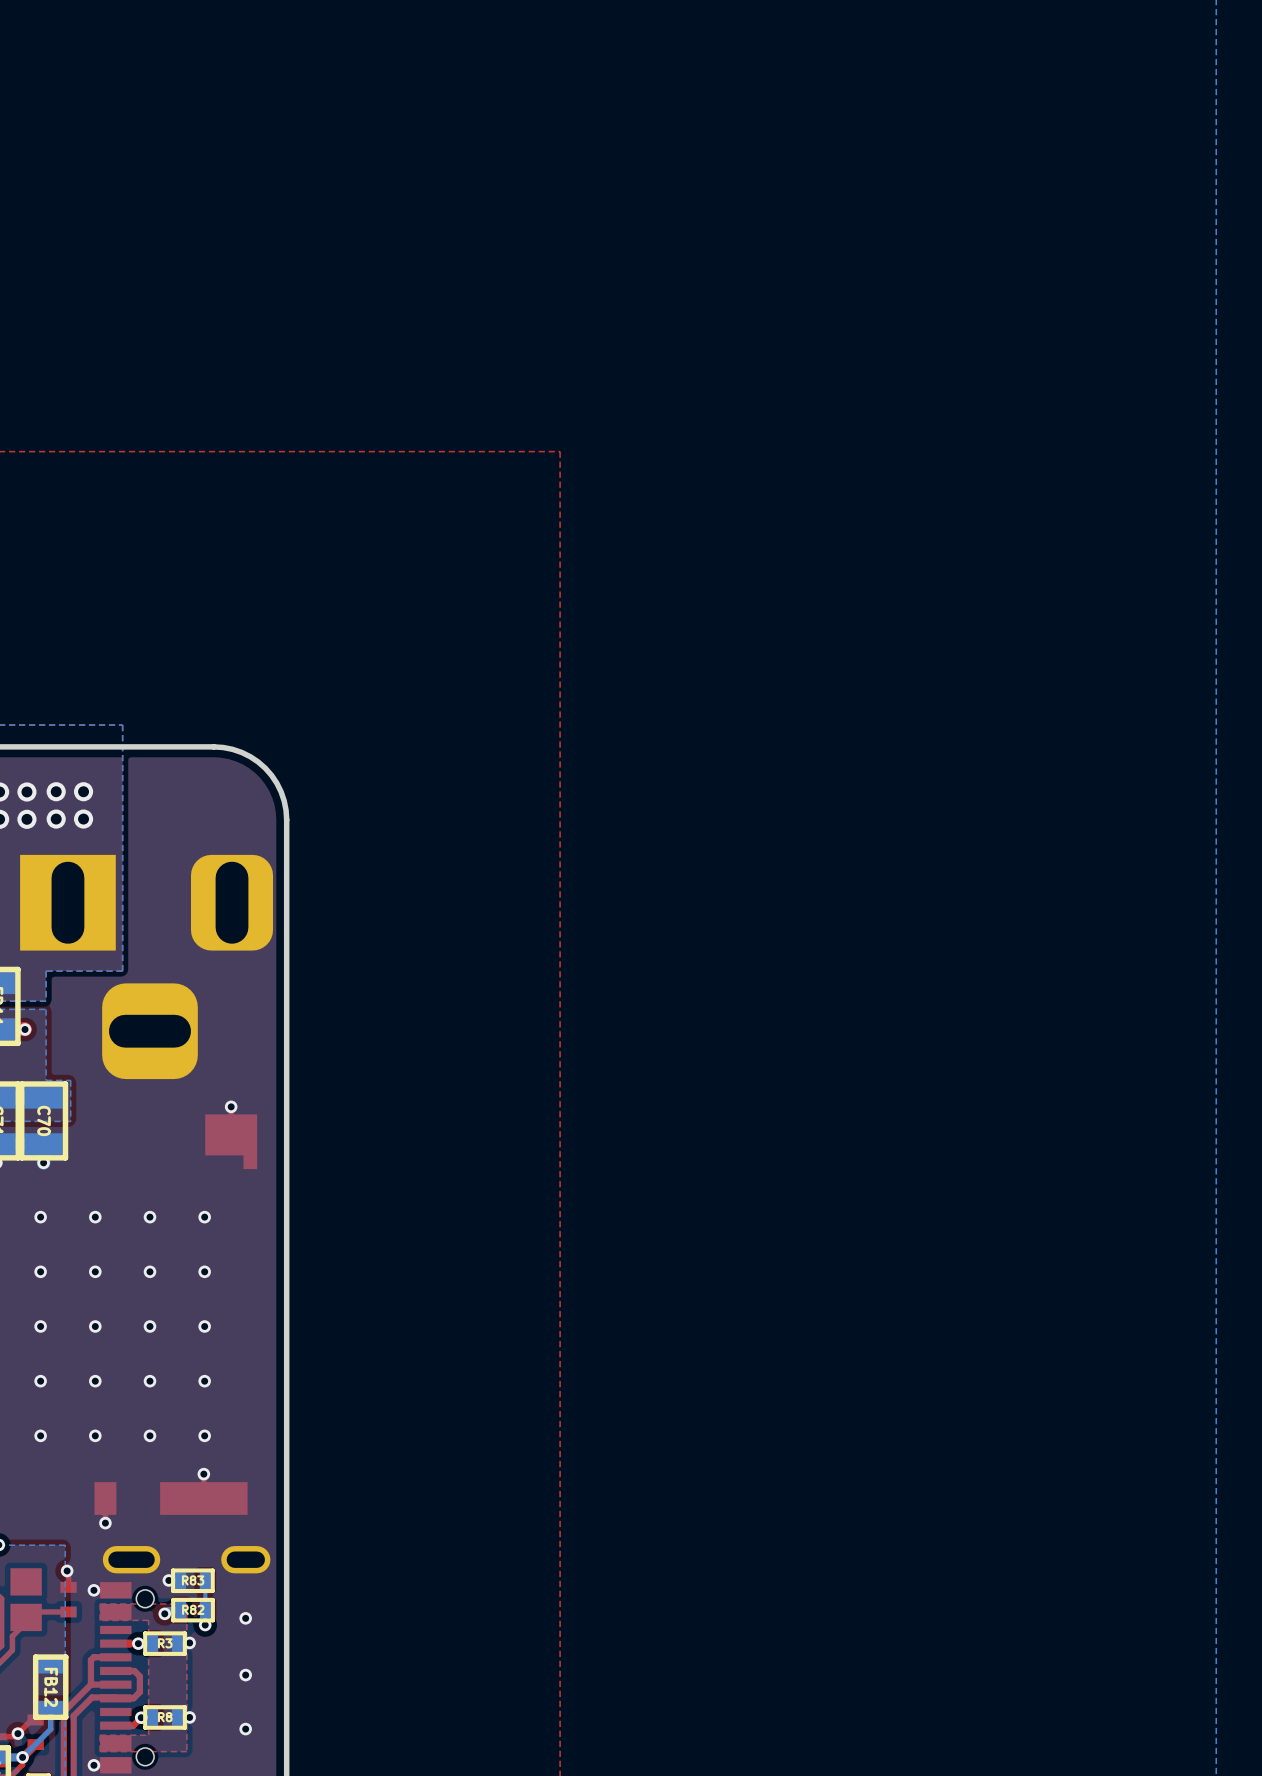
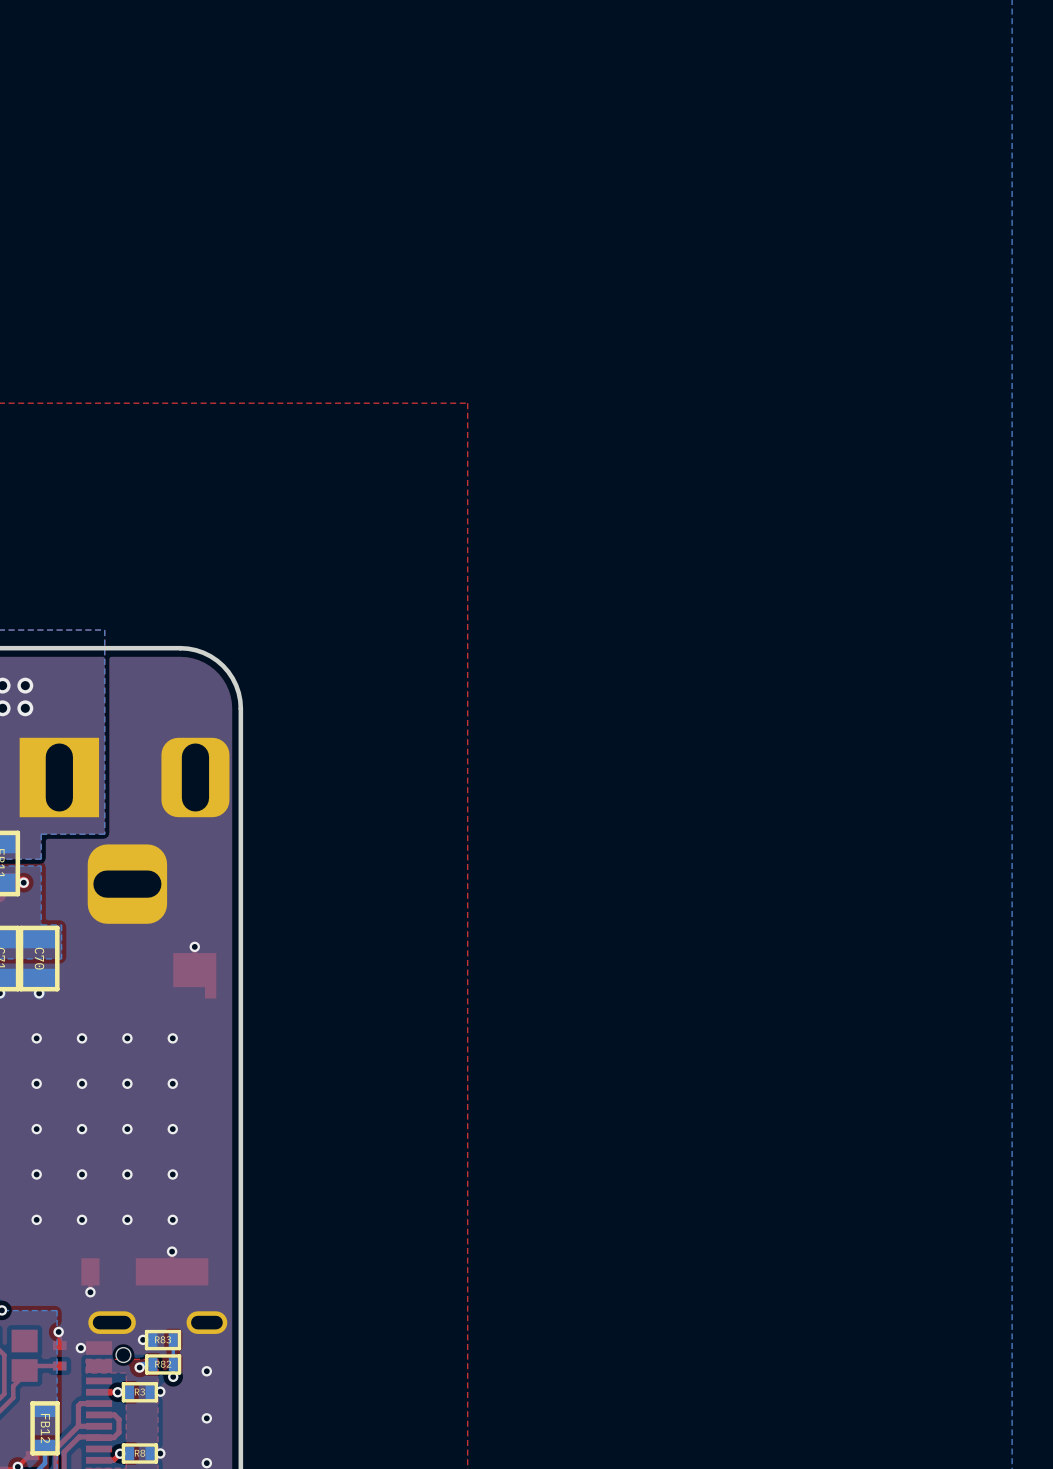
via: (56, 791) -> none
via: (83, 791) -> none
via: (56, 819) -> none
via: (83, 819) -> none

